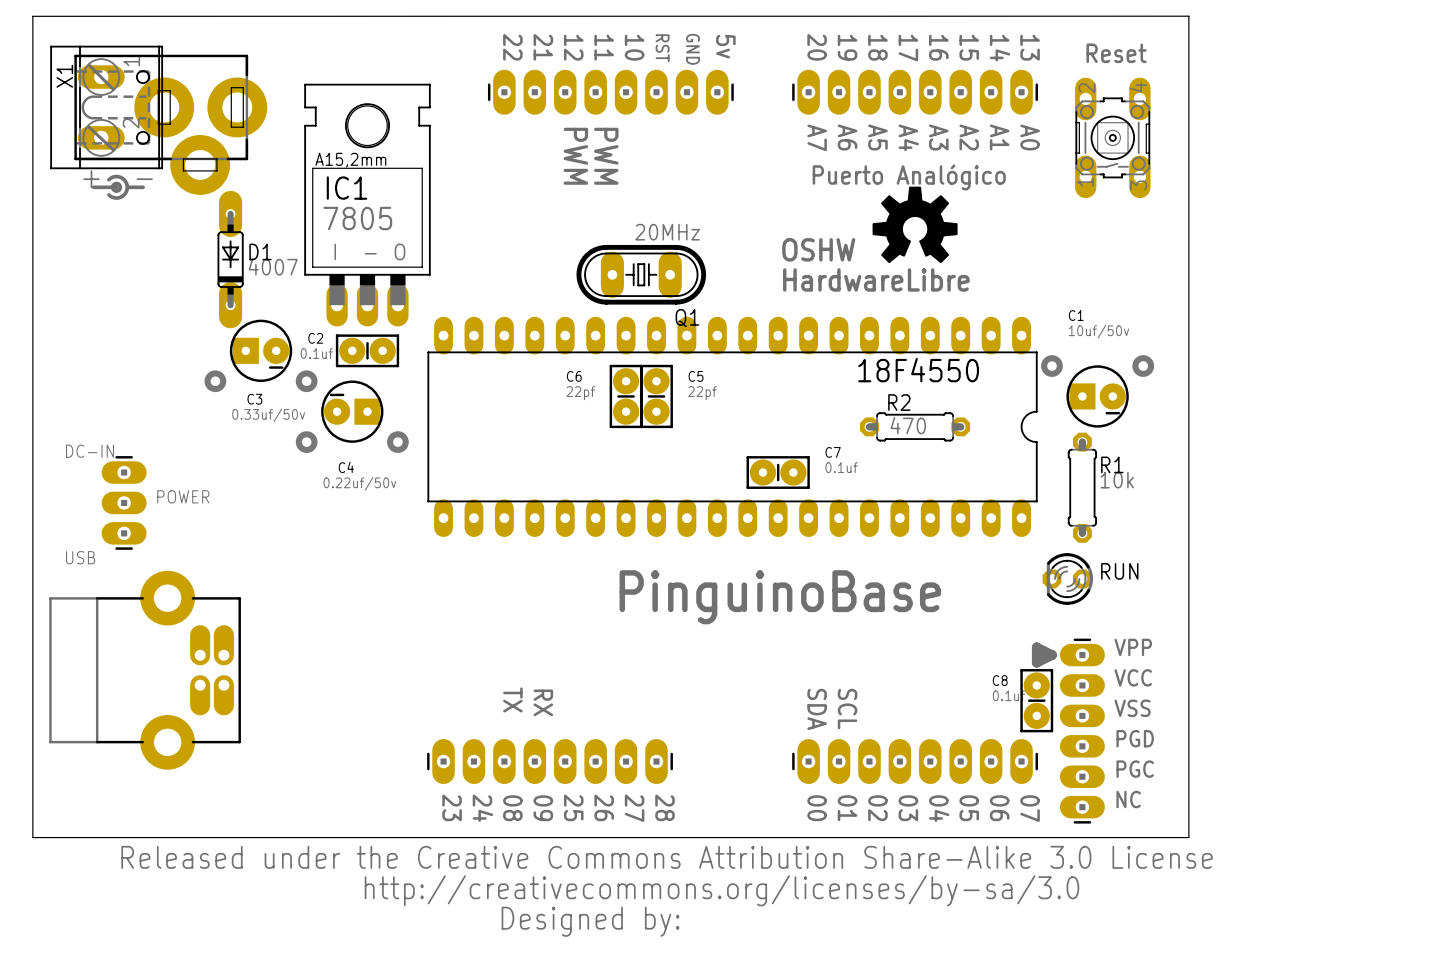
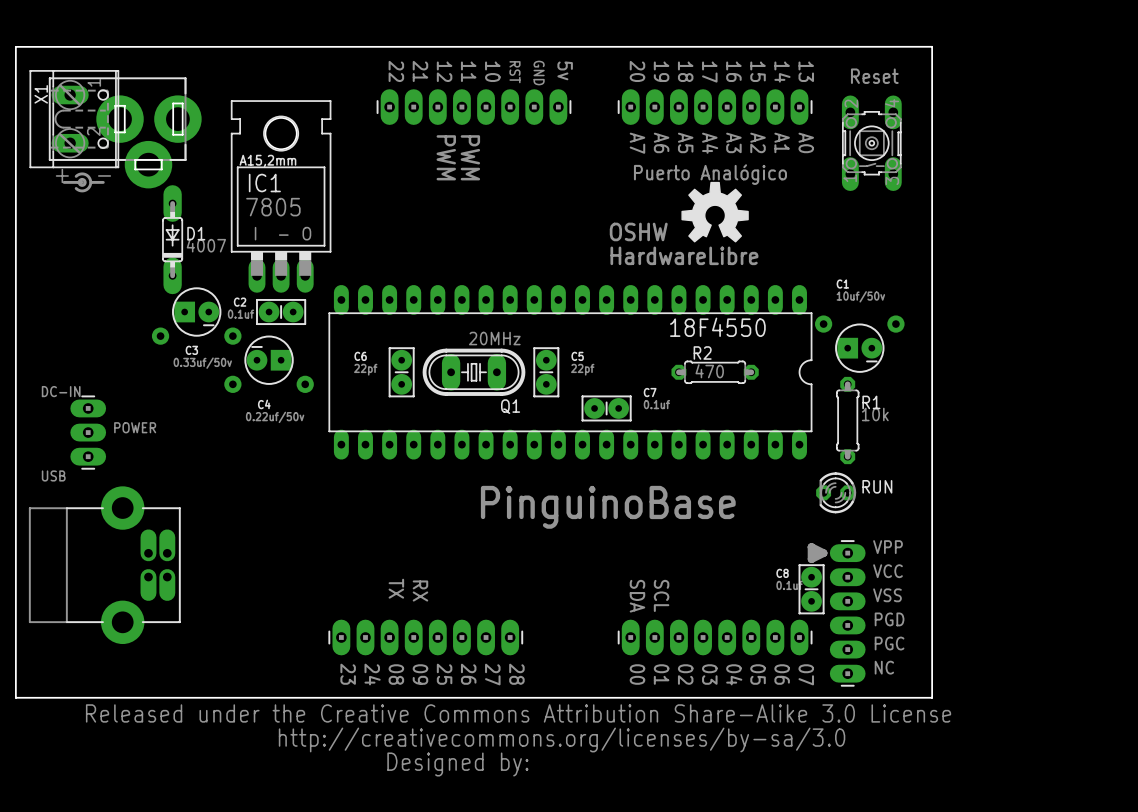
Q1 position: (641, 274) -> (474, 372)
C6 position: (626, 396) -> (401, 372)
C5 position: (656, 396) -> (546, 372)

